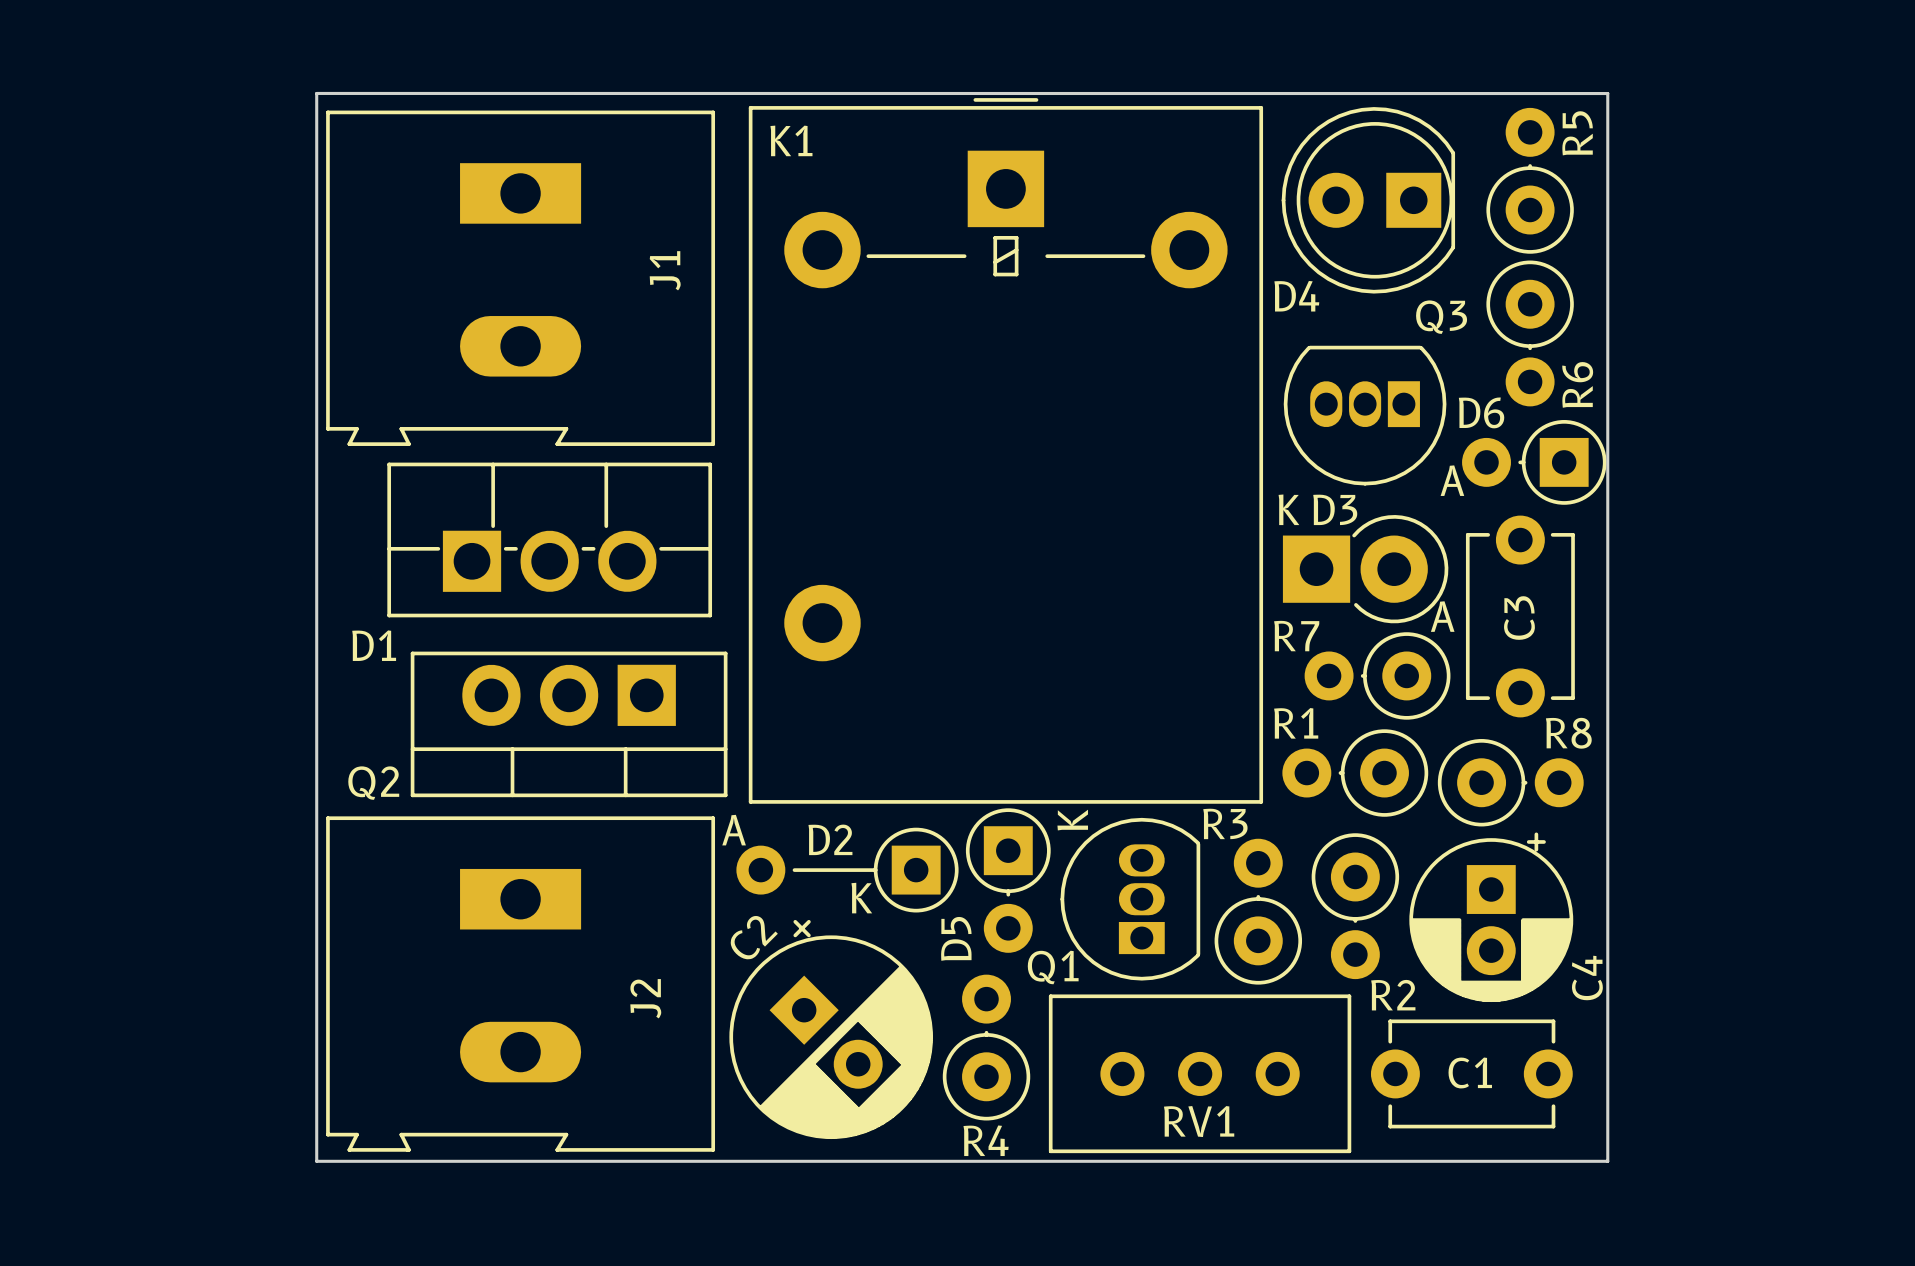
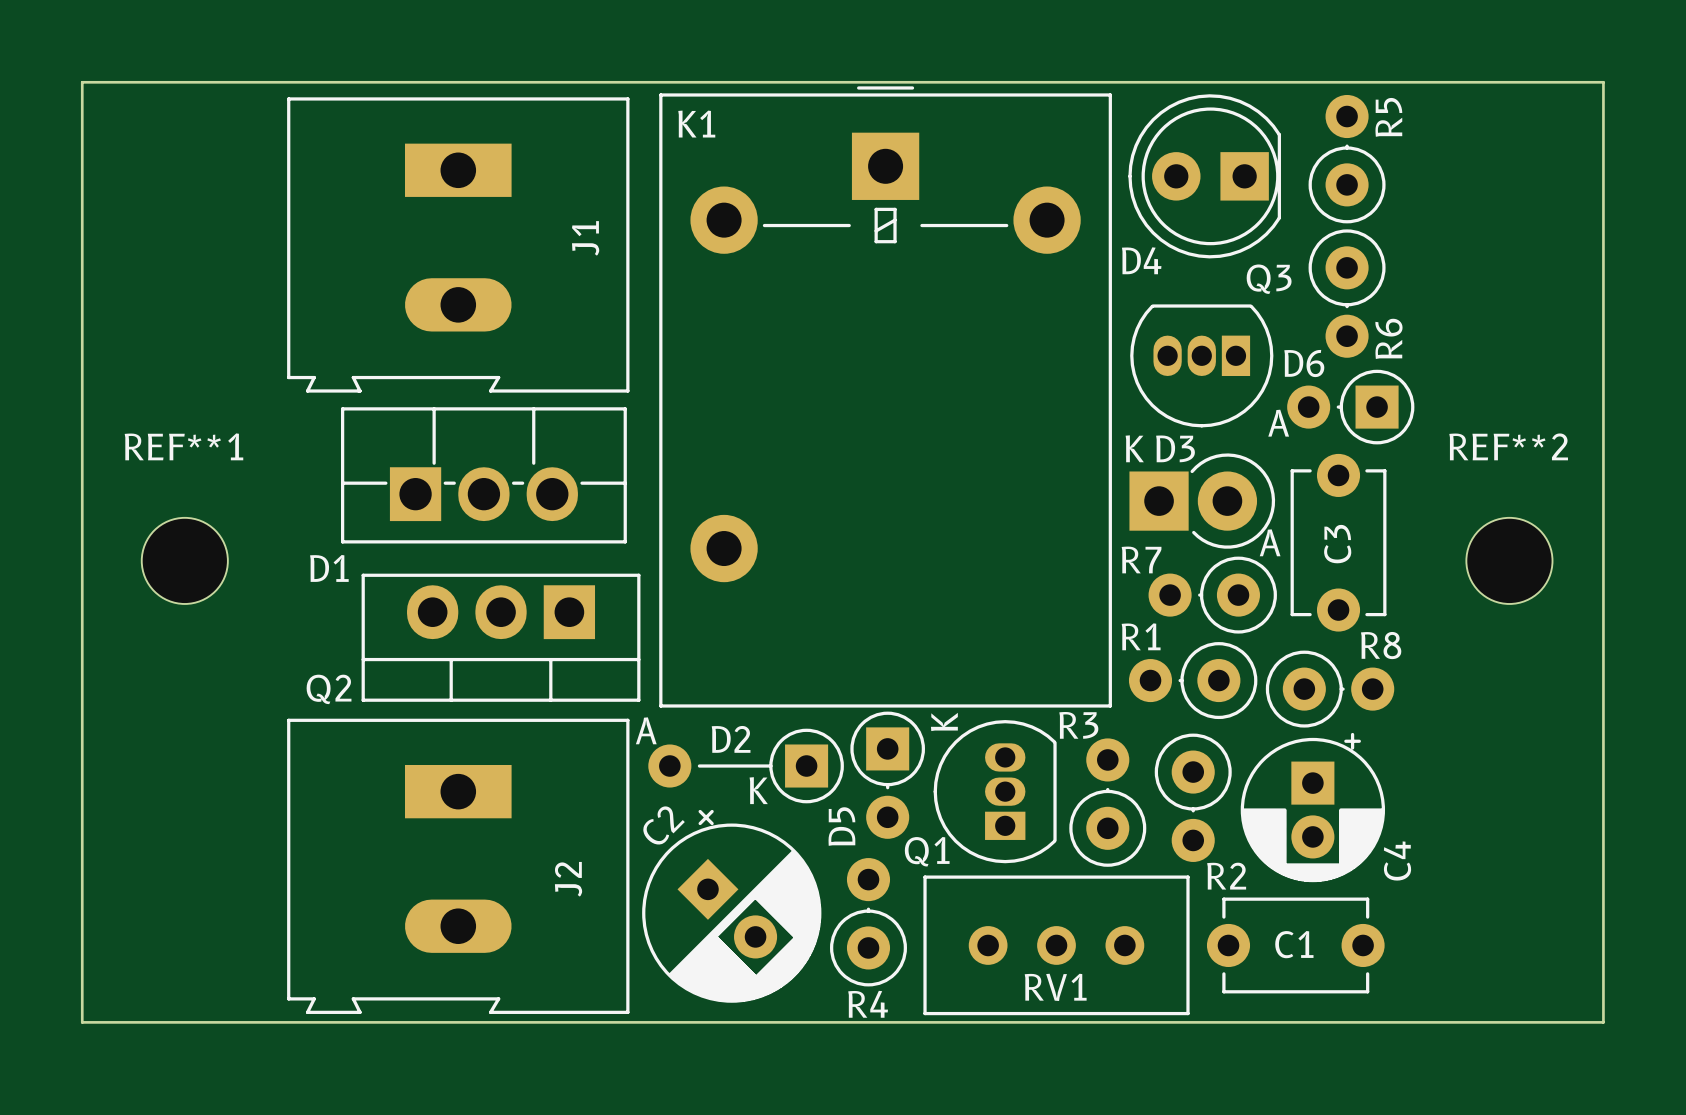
REF**1: none -> (184, 560)
REF**2: none -> (1509, 560)
board edge: (316, 1161) (316, 93) (1607, 93) (1607, 1161) -> (278, 1022) (82, 1022) (82, 82) (1603, 82) (1603, 1022) (1415, 1022)

